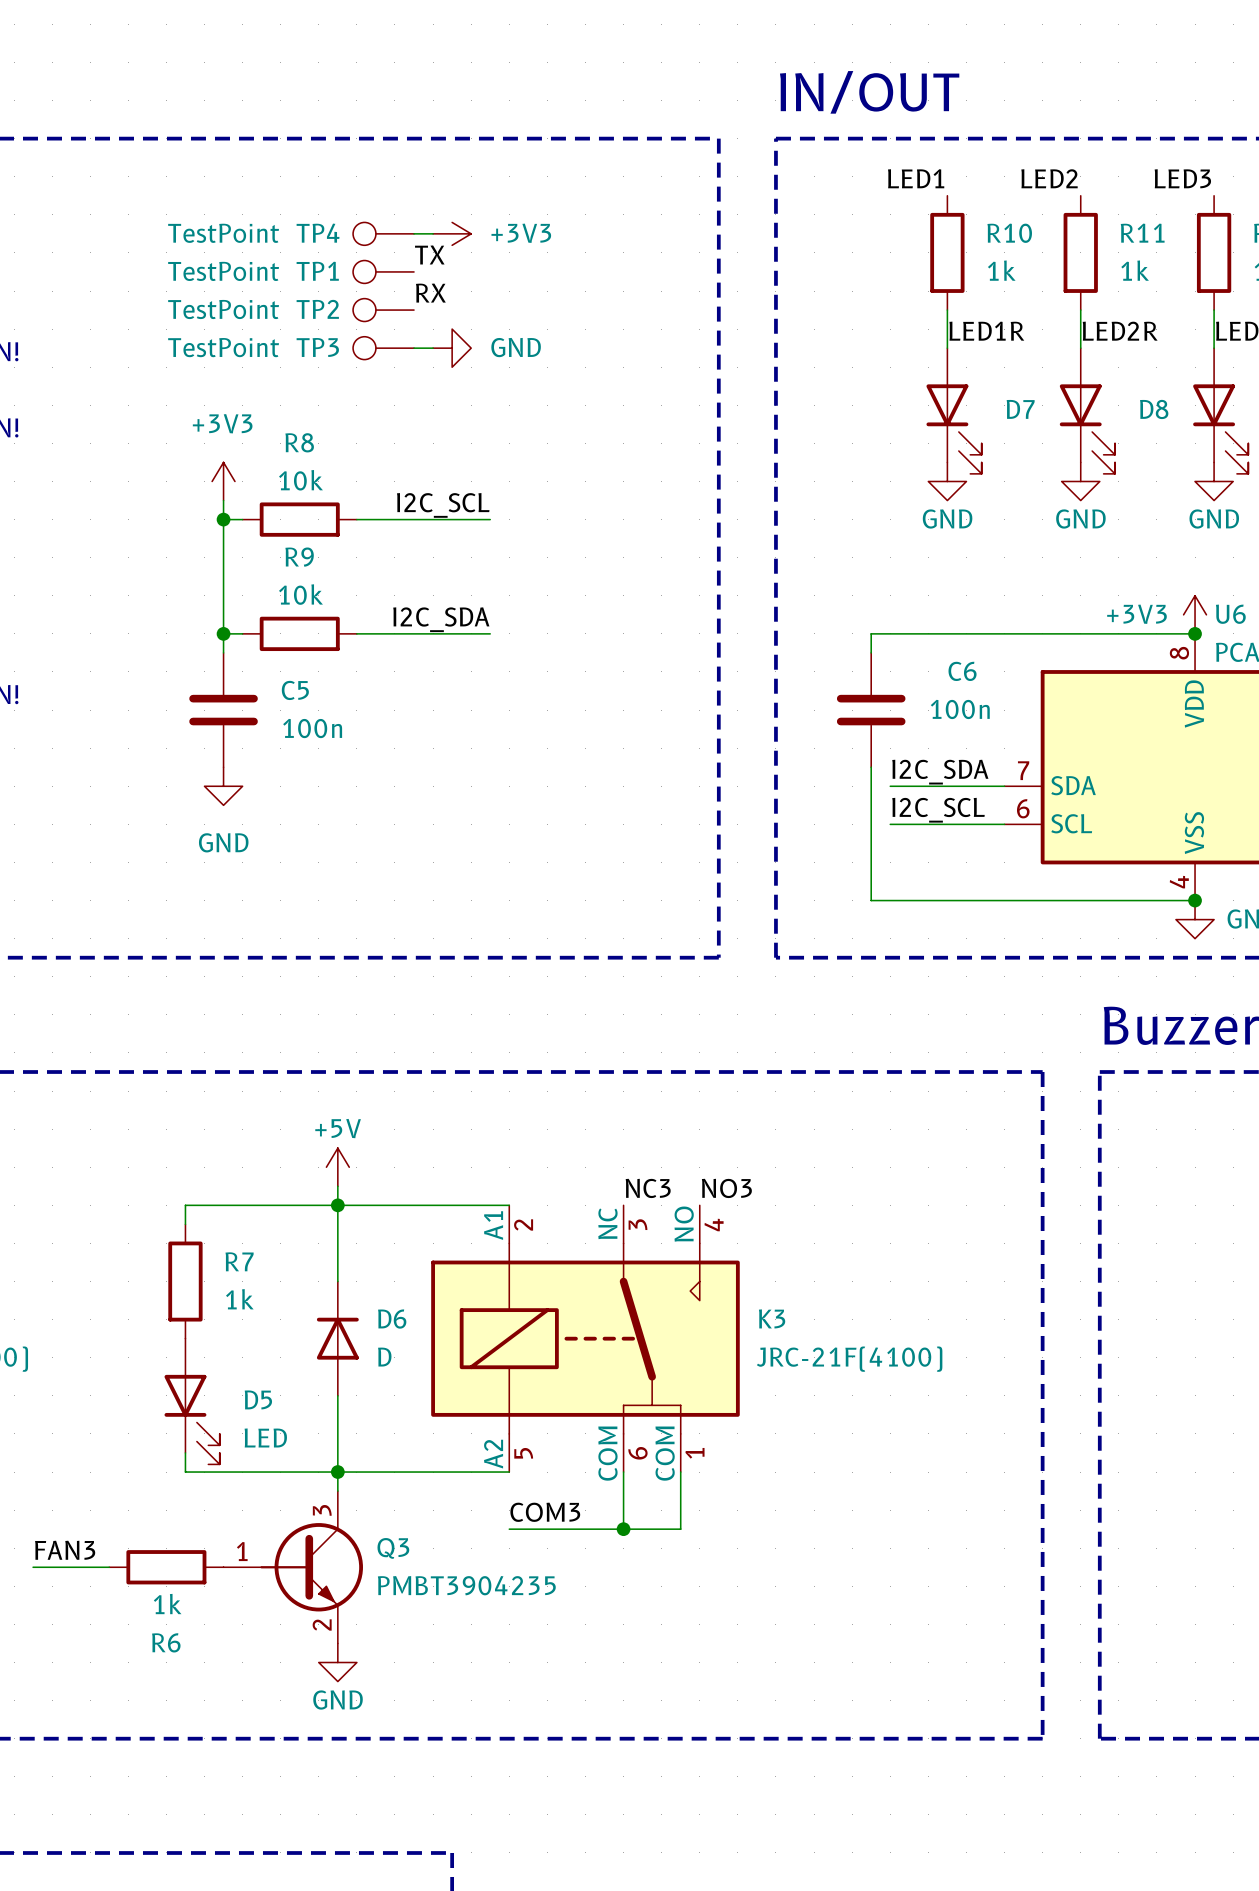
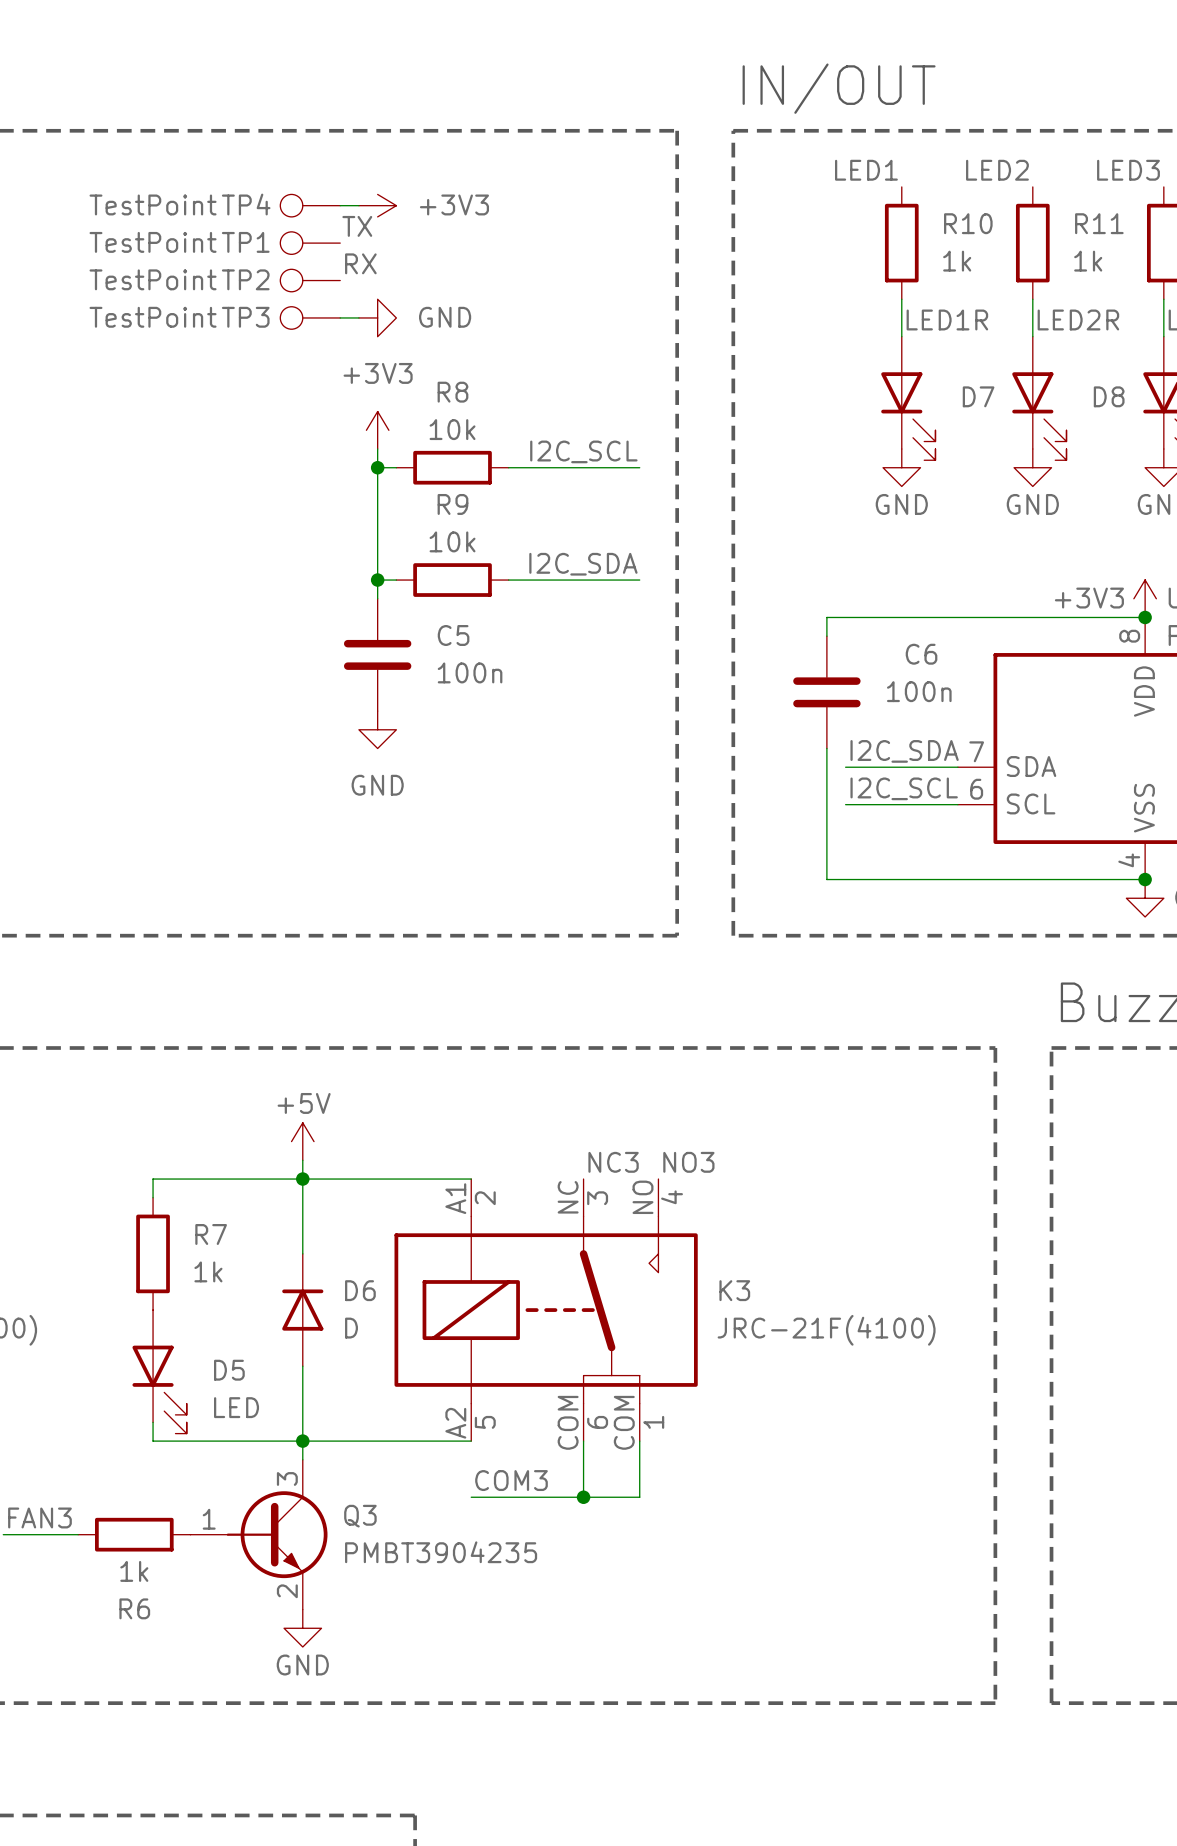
TP4 position: (383, 233) -> (310, 205)
wire: (414, 233) (433, 233) -> (340, 205) (358, 205)
power symbol position: +3V3 (452, 233) -> +3V3 (377, 205)
label position: TX (429, 254) -> TX (357, 226)
TP1 position: (383, 271) -> (310, 243)
label position: RX (430, 293) -> RX (360, 263)
TP2 position: (383, 310) -> (310, 280)
TP3 position: (383, 348) -> (310, 317)
wire: (414, 348) (433, 348) -> (340, 317) (358, 317)
power symbol position: GND (452, 348) -> GND (377, 317)
power symbol: none -> +3V3 (377, 430)
power symbol: +3V3 (223, 481) -> none
junction: none -> (377, 467)
wire: (223, 500) (223, 652) -> (377, 449) (377, 598)
label position: I2C_SCL (443, 505) -> I2C_SCL (583, 451)
wire: (223, 519) (242, 519) -> (377, 467) (396, 467)
junction: (223, 519) -> none
R8 position: (299, 519) -> (452, 467)
wire: (356, 519) (490, 519) -> (508, 467) (639, 467)
junction: none -> (377, 580)
label position: I2C_SDA (441, 619) -> I2C_SDA (583, 564)
wire: (223, 633) (242, 633) -> (377, 580) (396, 580)
junction: (223, 633) -> none
R9 position: (299, 633) -> (452, 580)
wire: (356, 633) (490, 633) -> (508, 580) (639, 580)
C5 position: (223, 710) -> (377, 654)
power symbol position: GND (223, 786) -> GND (377, 729)

